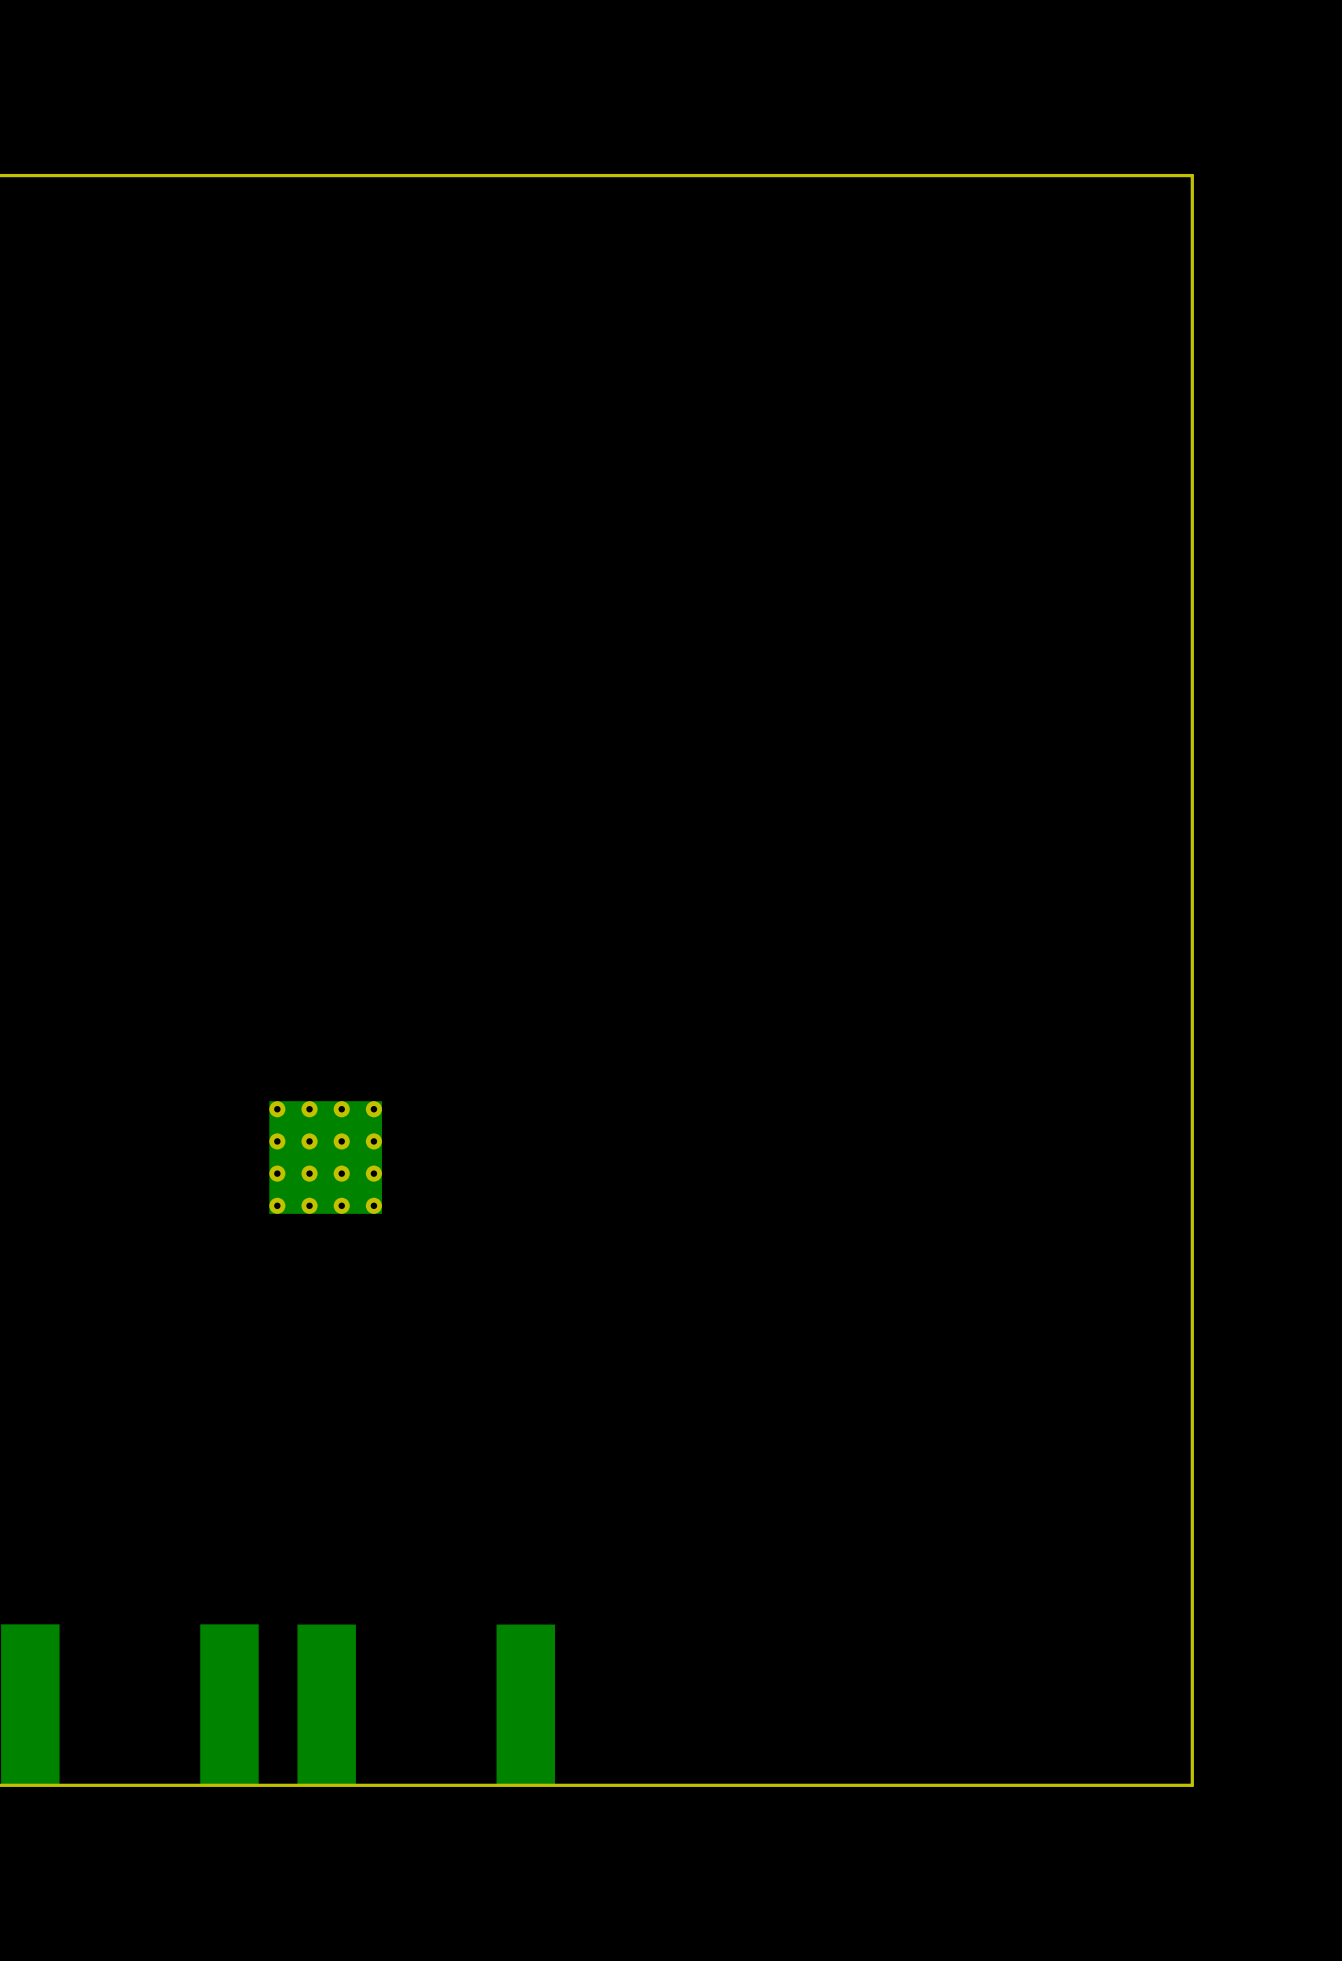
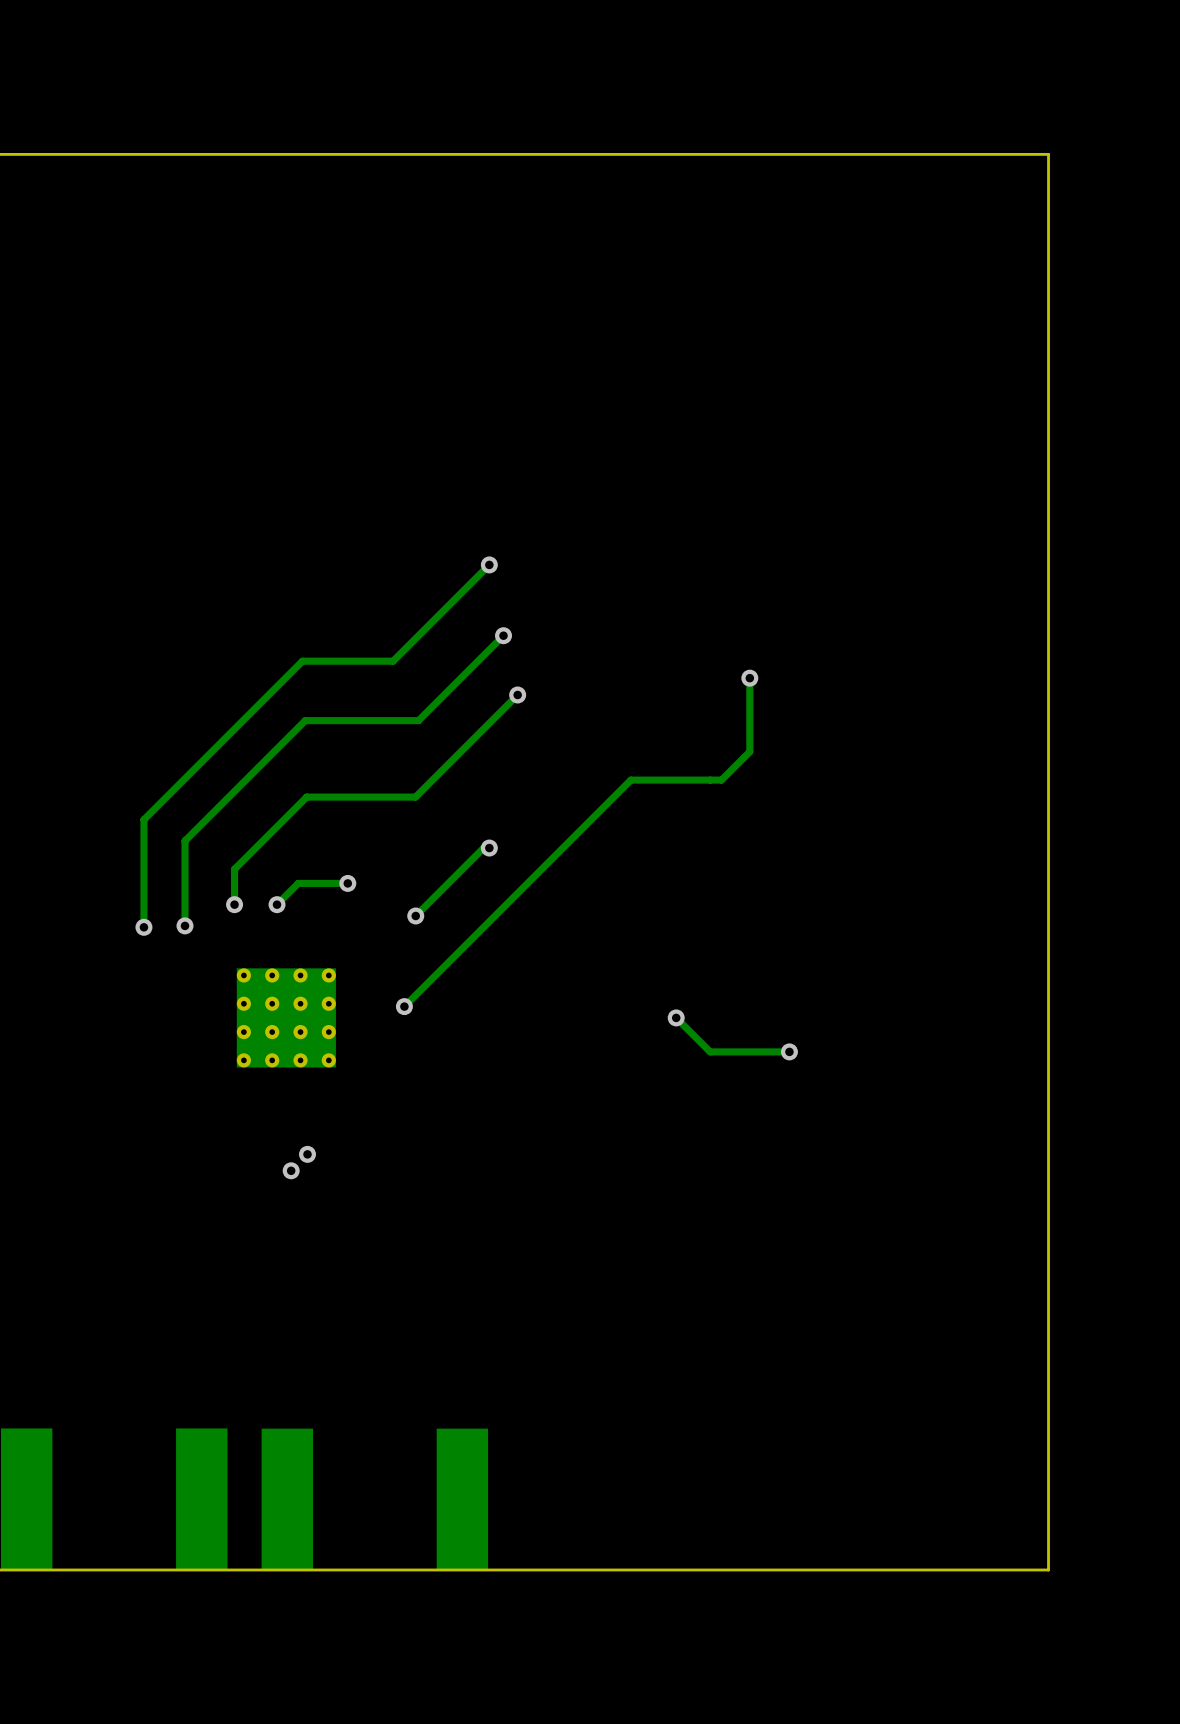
track: none -> (489, 564) (393, 661) (302, 661) (143, 819) (143, 927)
via: none -> (489, 564)
track: none -> (503, 635) (418, 720) (305, 720) (185, 840) (185, 925)
via: none -> (503, 635)
track: none -> (749, 678) (749, 751) (721, 780) (630, 780) (404, 1006)
via: none -> (749, 678)
track: none -> (517, 694) (415, 797) (306, 797) (234, 869) (234, 904)
via: none -> (517, 694)
track: none -> (489, 848) (483, 848) (415, 915)
via: none -> (489, 848)
track: none -> (347, 883) (298, 883) (277, 904)
via: none -> (347, 883)
via: none -> (234, 904)
via: none -> (277, 904)
via: none -> (415, 915)
via: none -> (185, 925)
via: none -> (143, 927)
via: none -> (404, 1006)
track: none -> (676, 1017) (710, 1051) (789, 1051)
via: none -> (676, 1017)
via: none -> (789, 1051)
via: none -> (307, 1154)
via: none -> (291, 1170)

